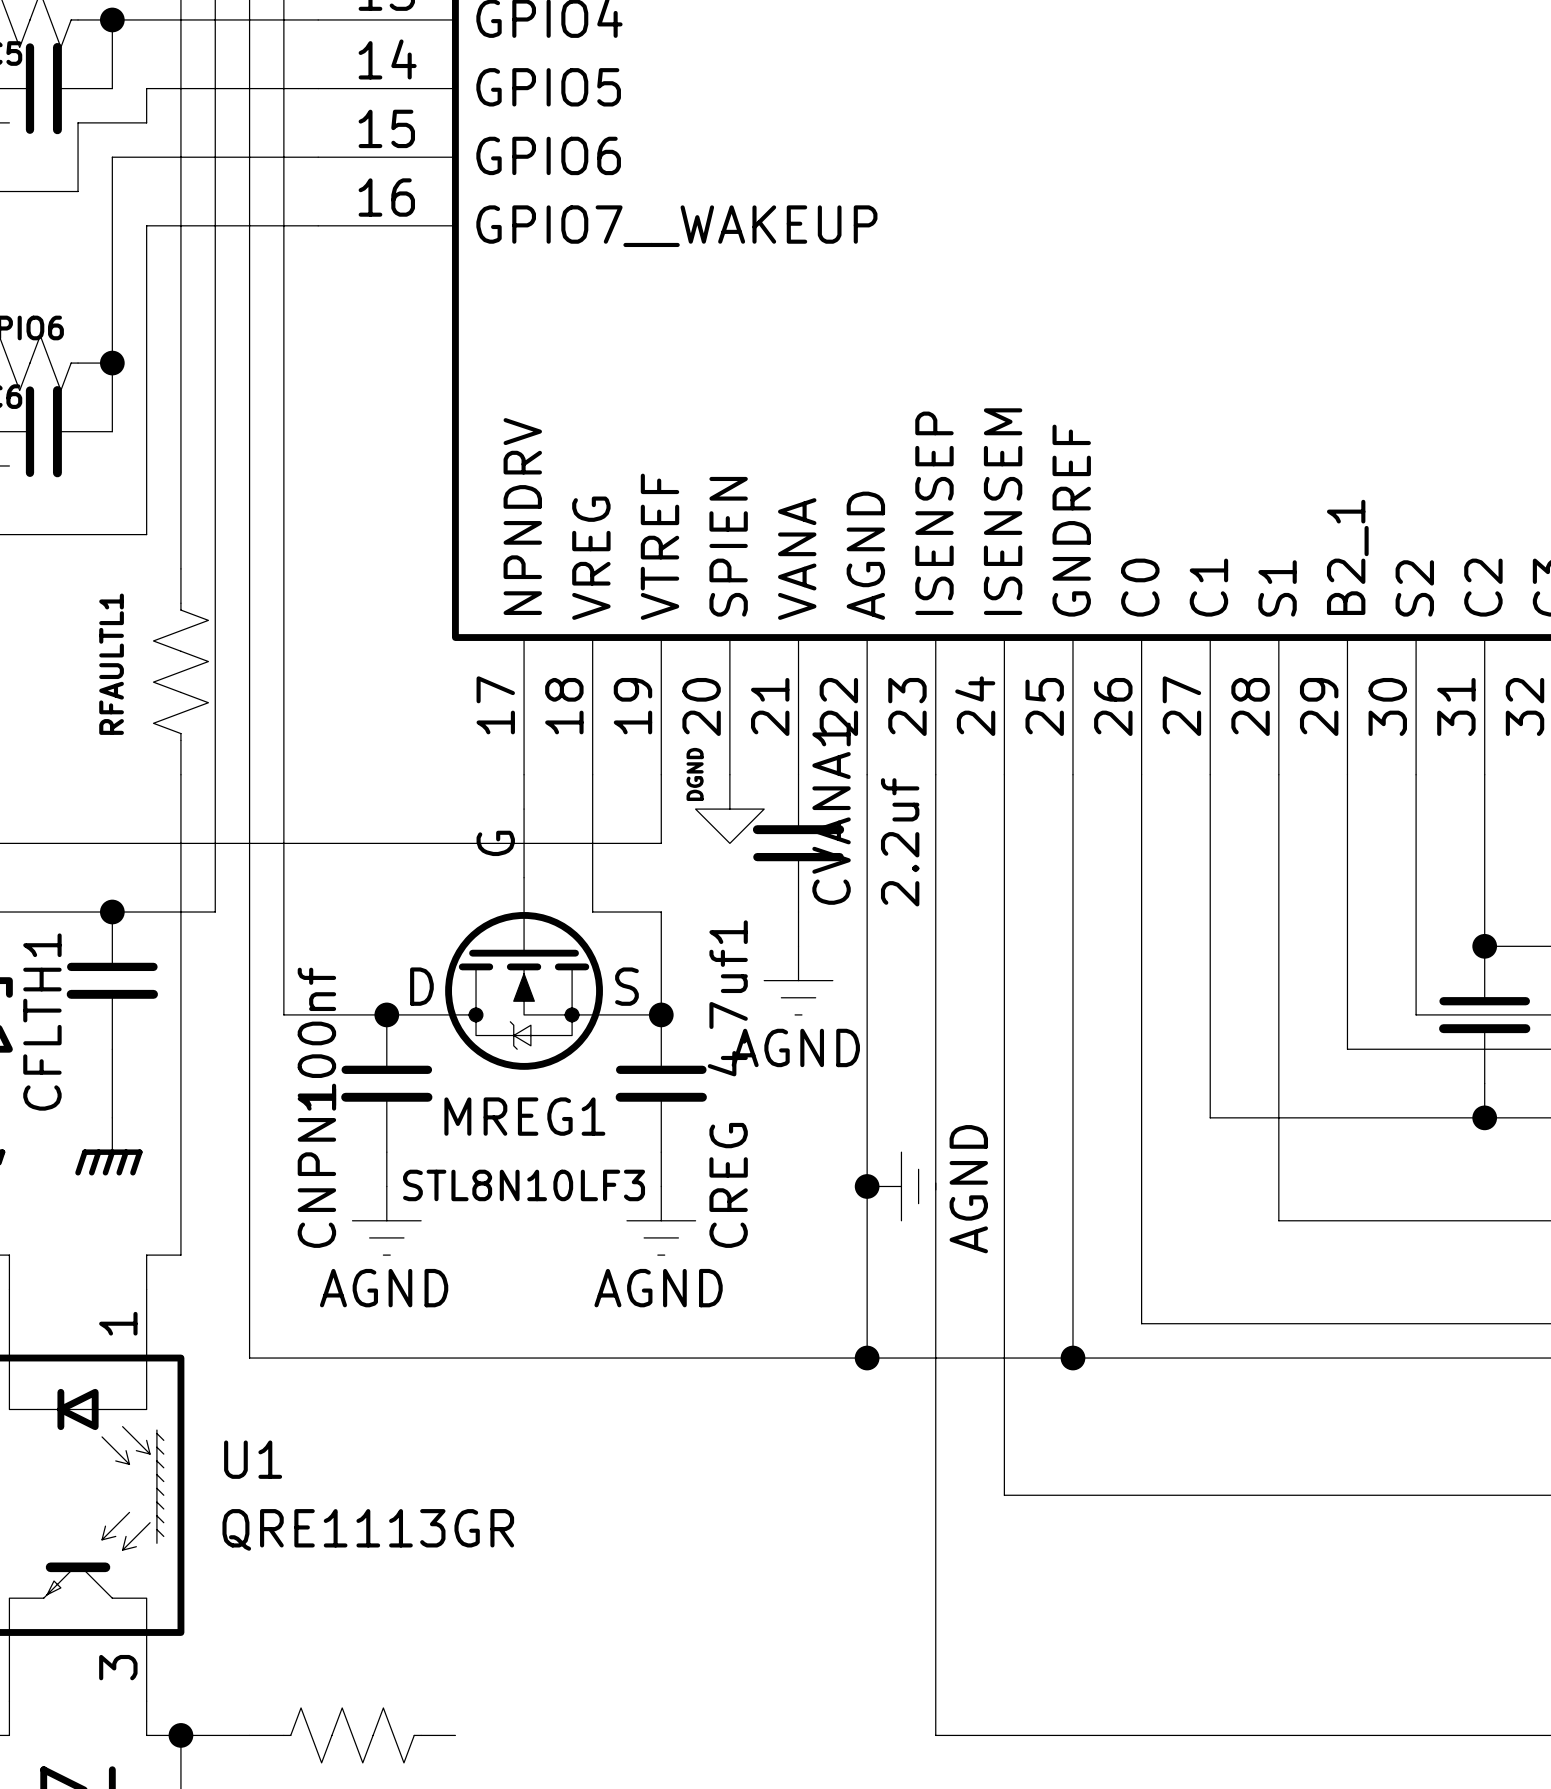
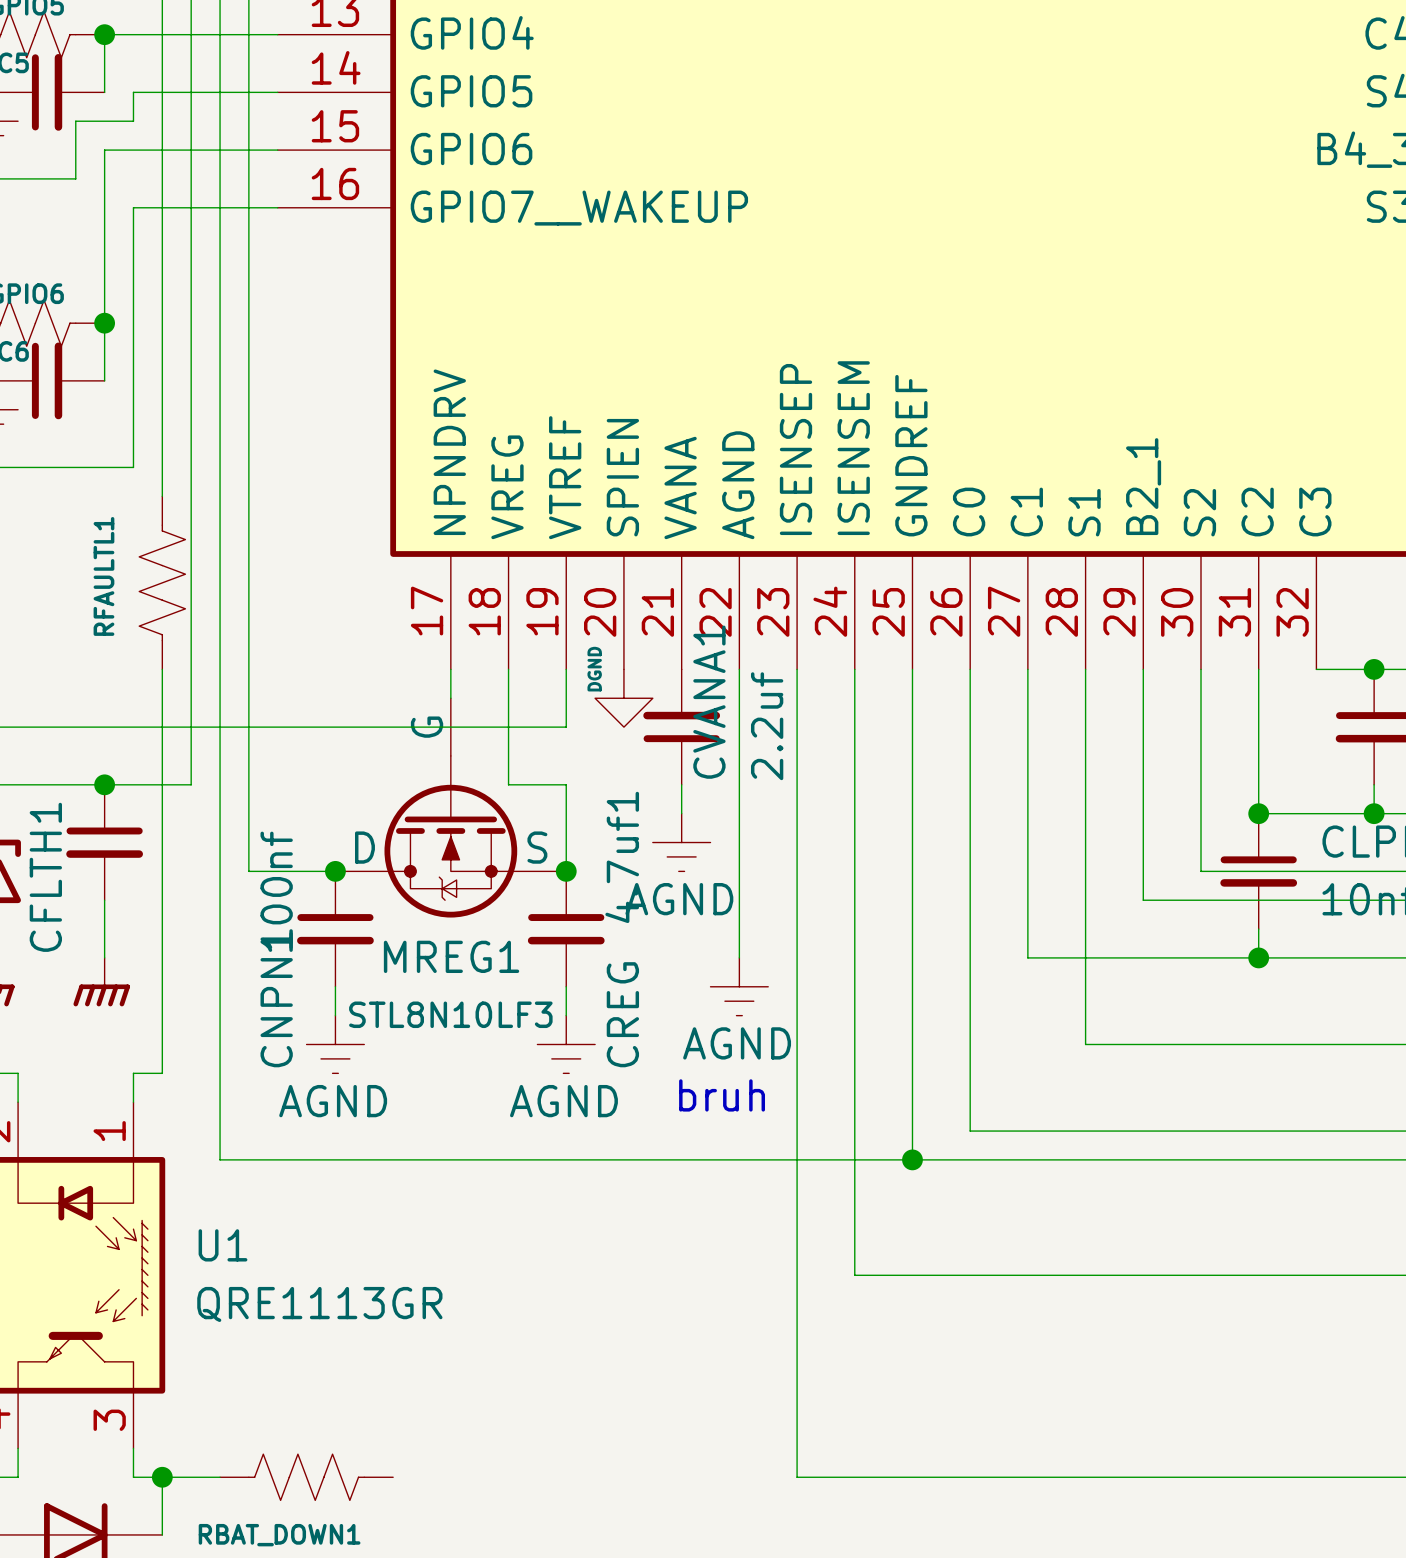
wire: (867, 1117) (867, 1358) -> none
junction: (867, 1186) -> none
power symbol rotation: 0° (901, 1186) -> 90° clockwise (739, 986)
power symbol position: AGND (901, 1186) -> AGND (739, 986)
text: none -> bruh (722, 1095)
junction: (867, 1358) -> none

